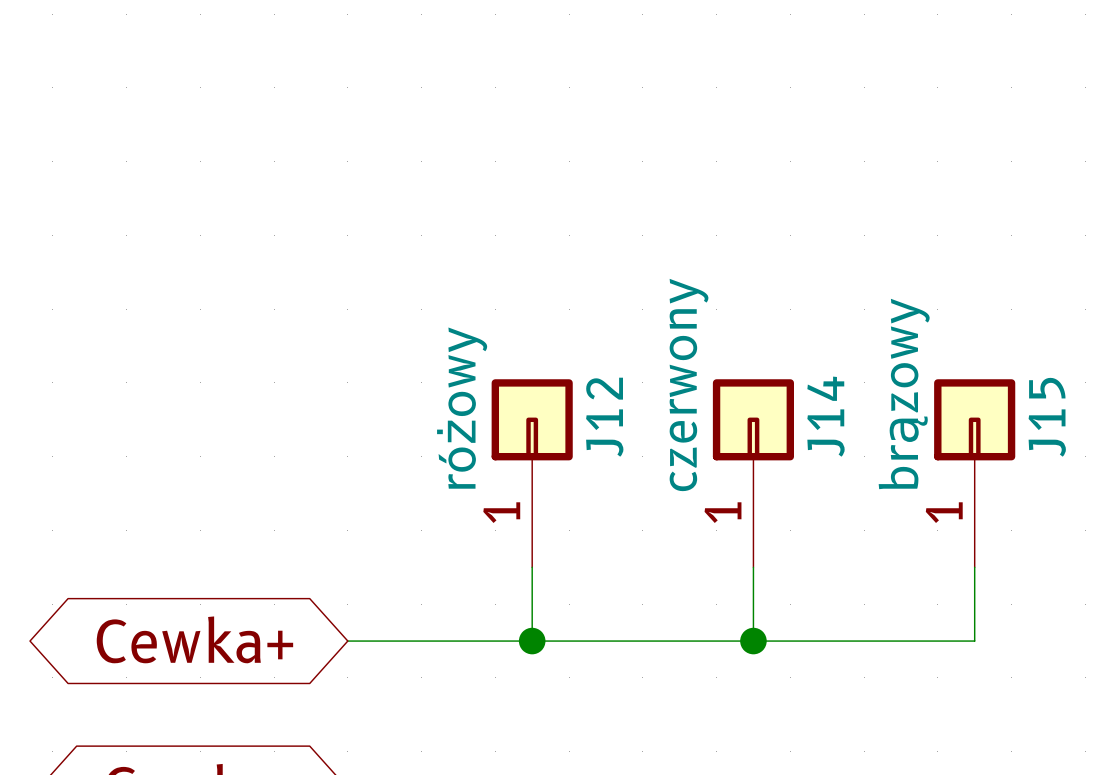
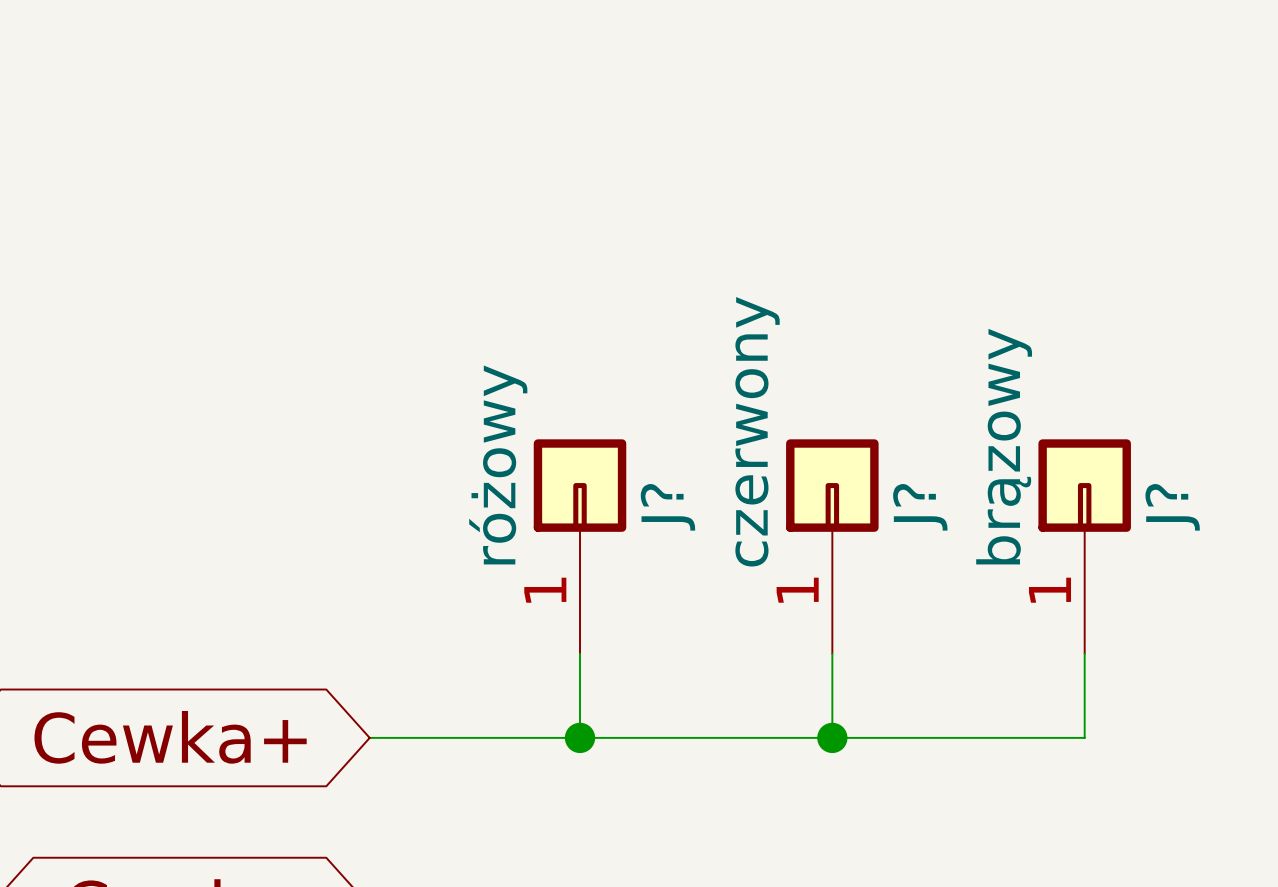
J14 name: J14 (826, 416) -> J? (920, 507)
J12 name: J12 (604, 417) -> J? (667, 507)
J15 name: J15 (1047, 417) -> J? (1172, 507)

